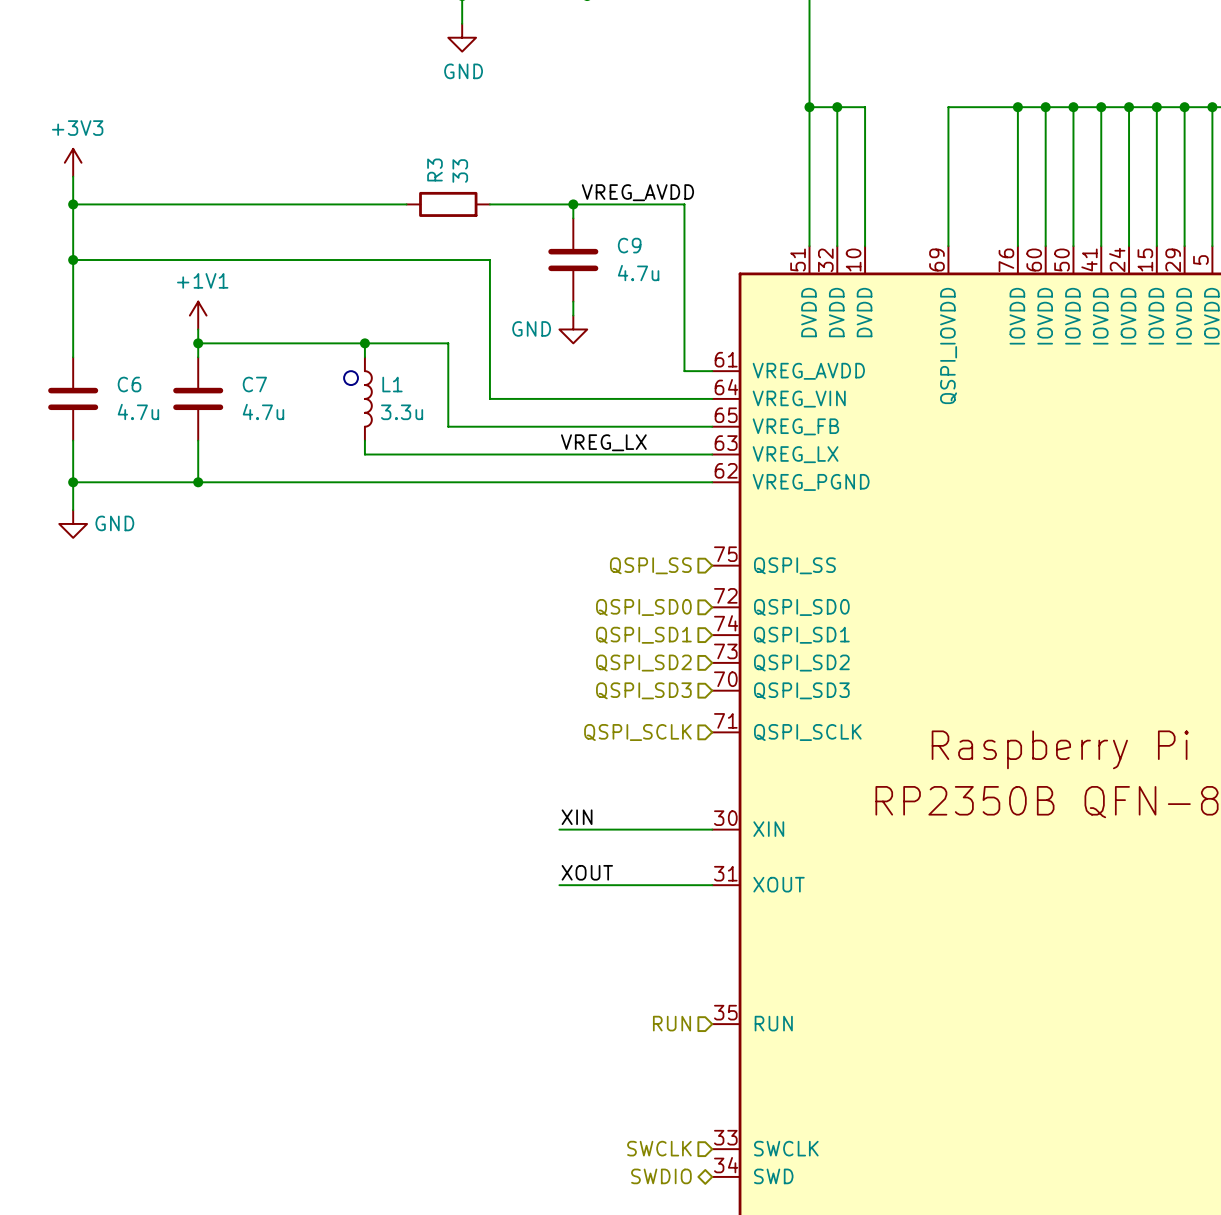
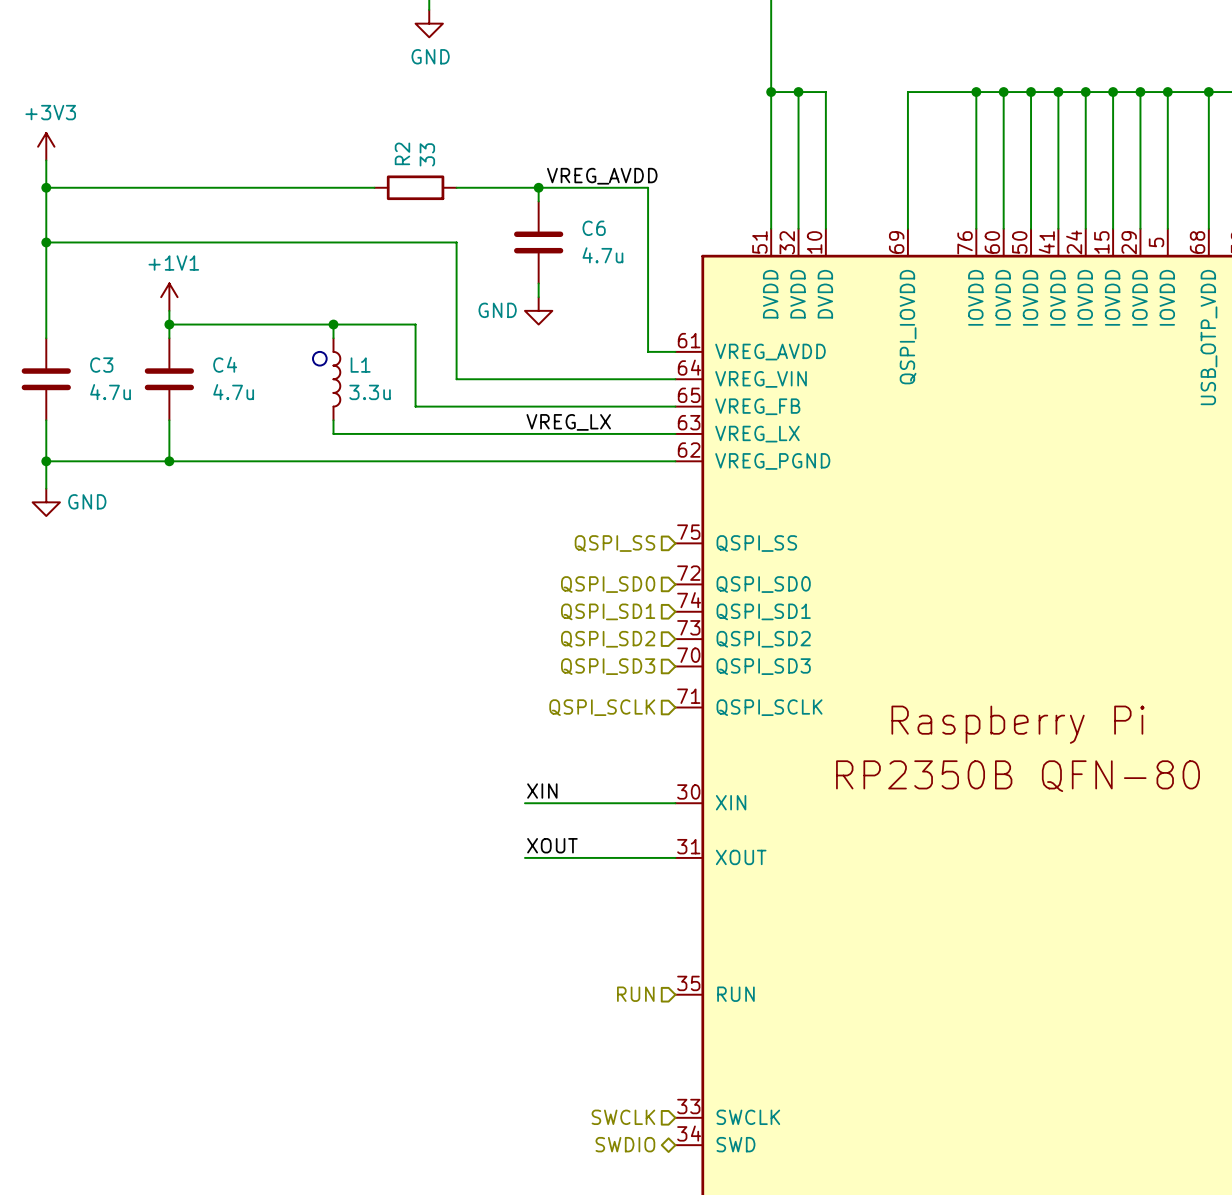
R3 name: R3 (434, 169) -> R2 (402, 153)
C9 name: C9 (629, 245) -> C6 (594, 228)
C6 name: C6 (129, 384) -> C3 (101, 365)
C7 name: C7 (254, 384) -> C4 (225, 364)

